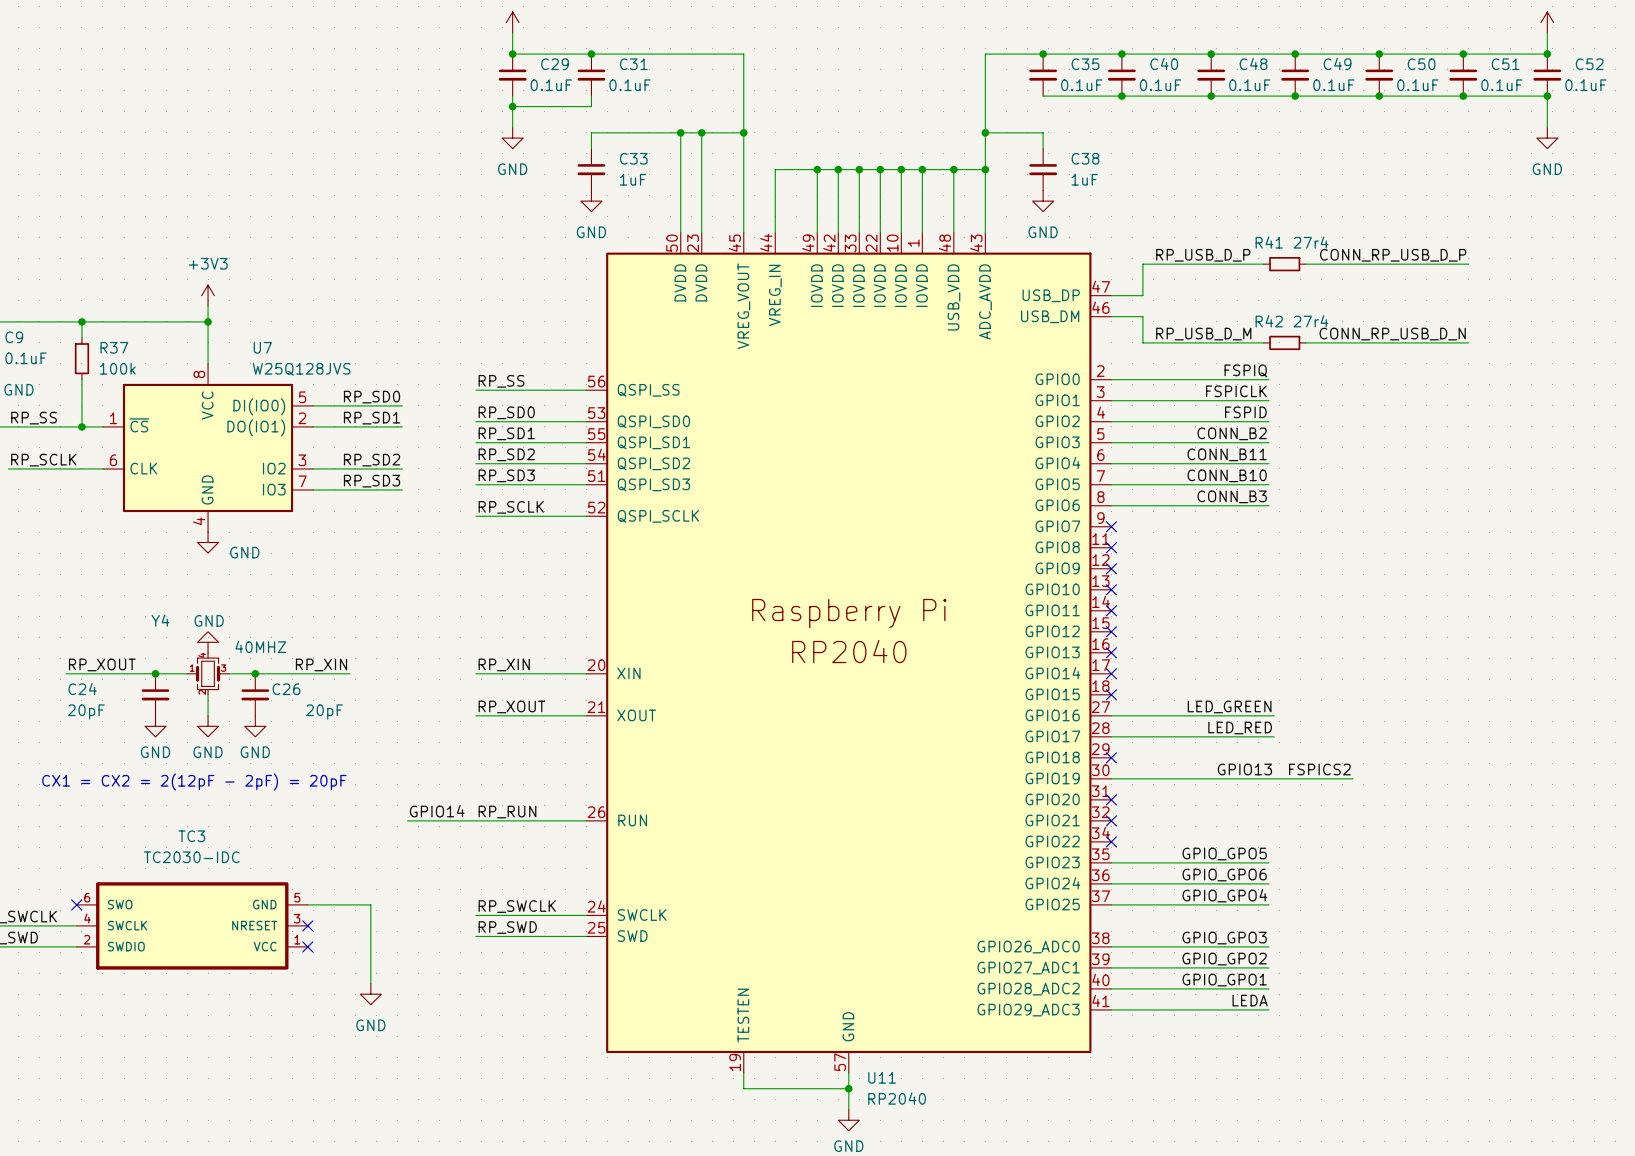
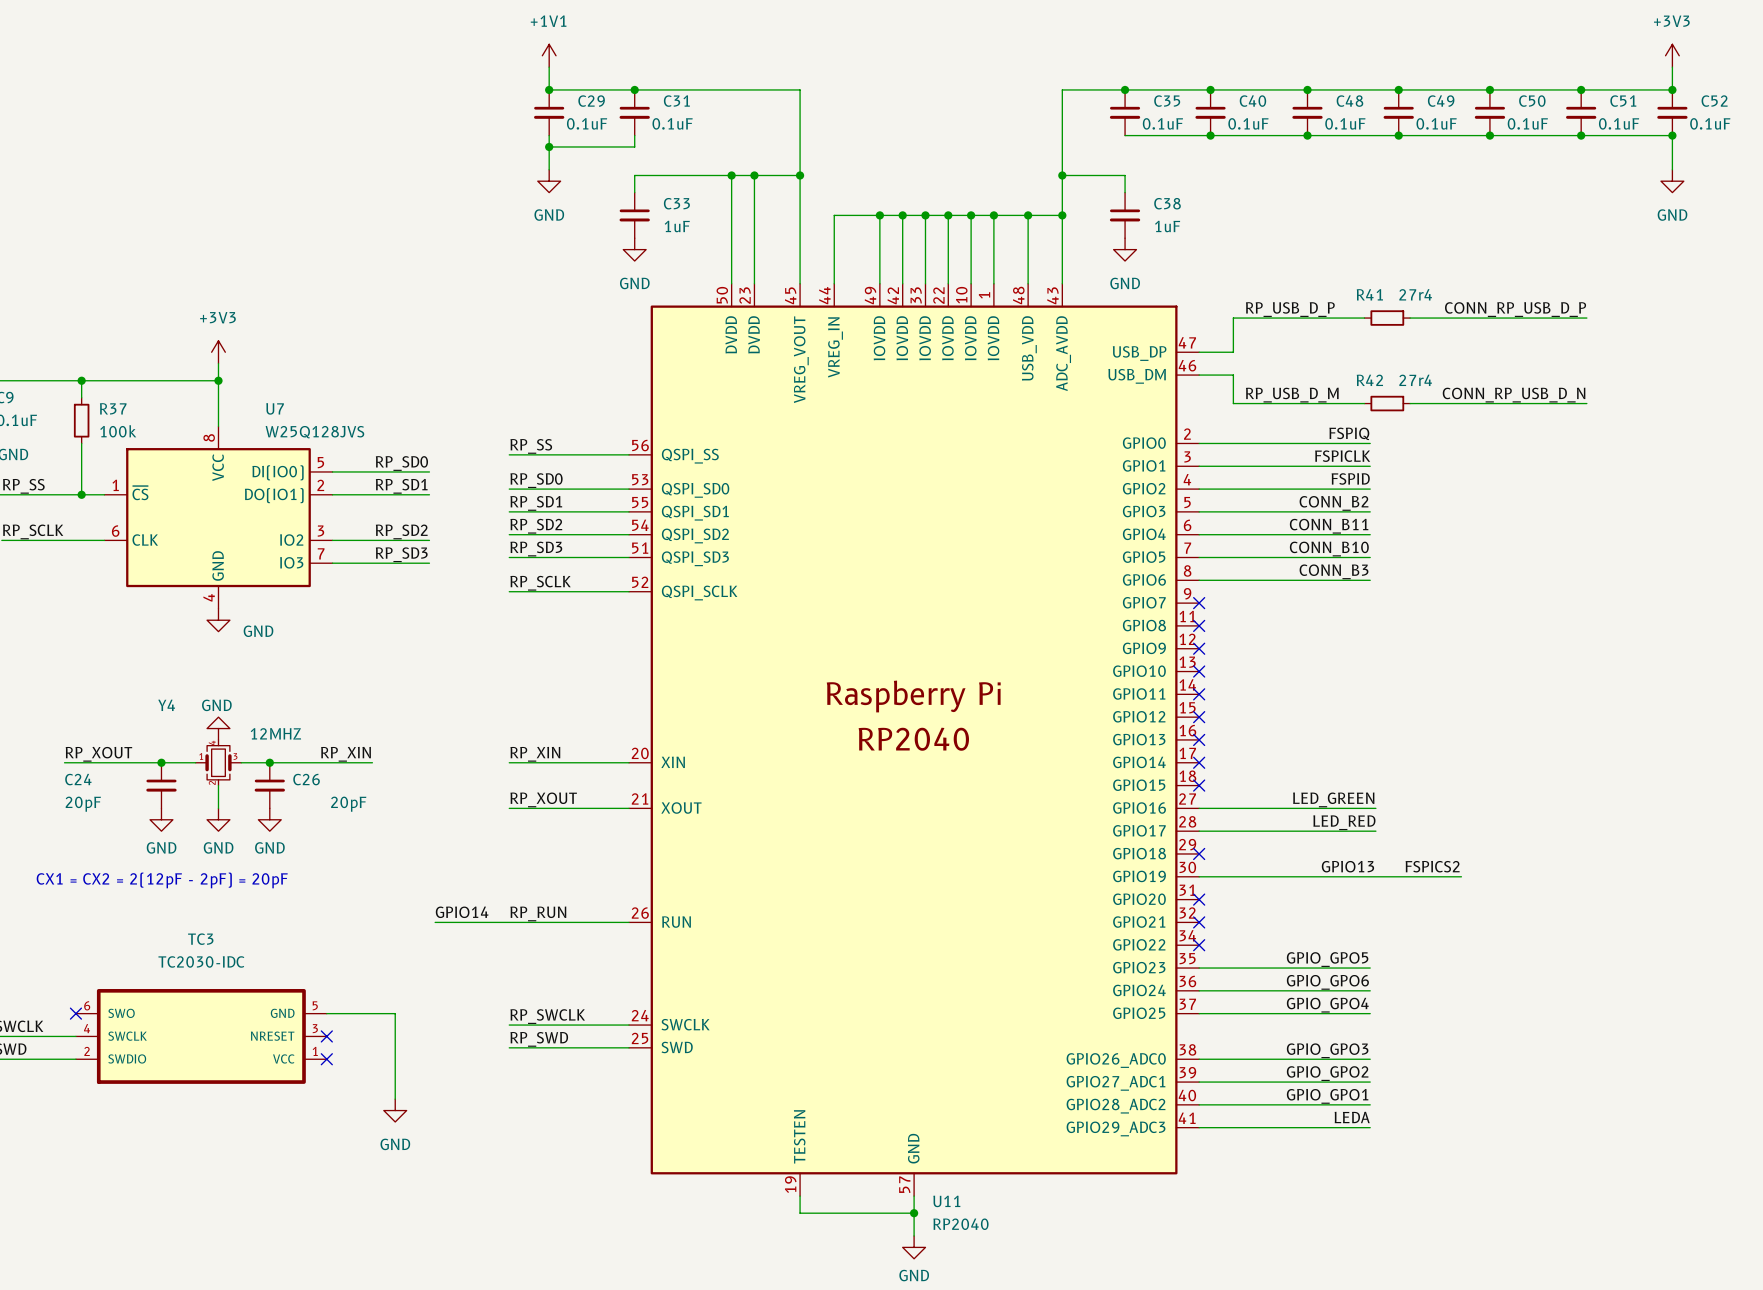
Y4 value: 40MHZ (260, 646) -> 12MHZ (275, 733)

